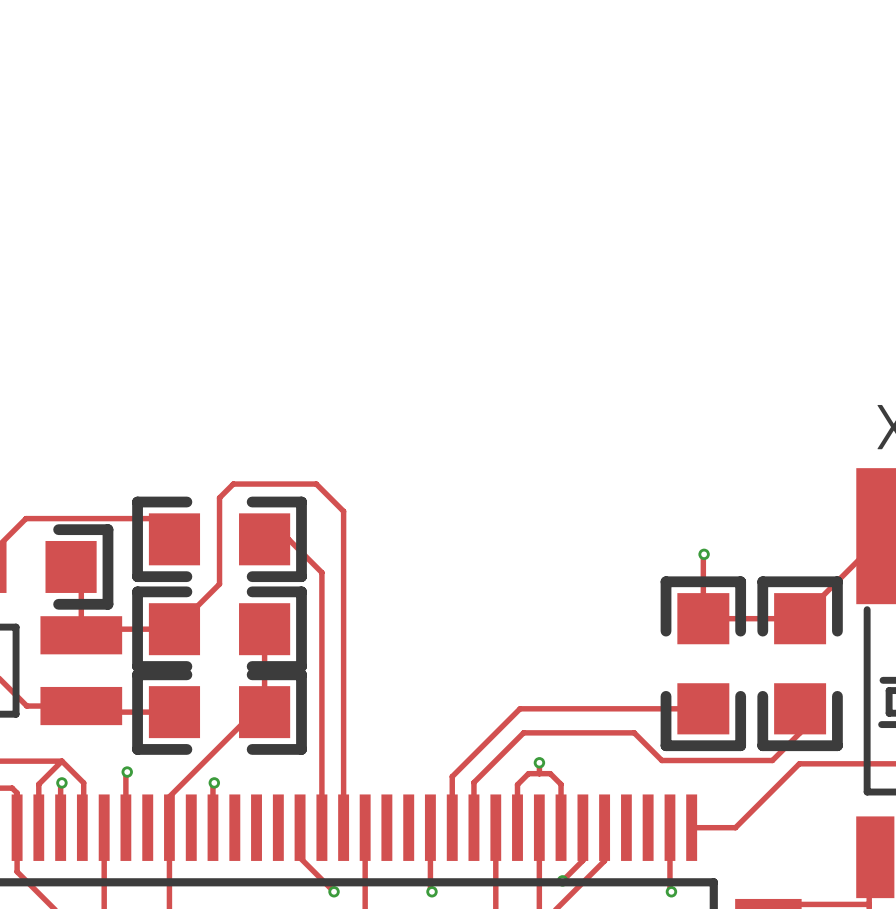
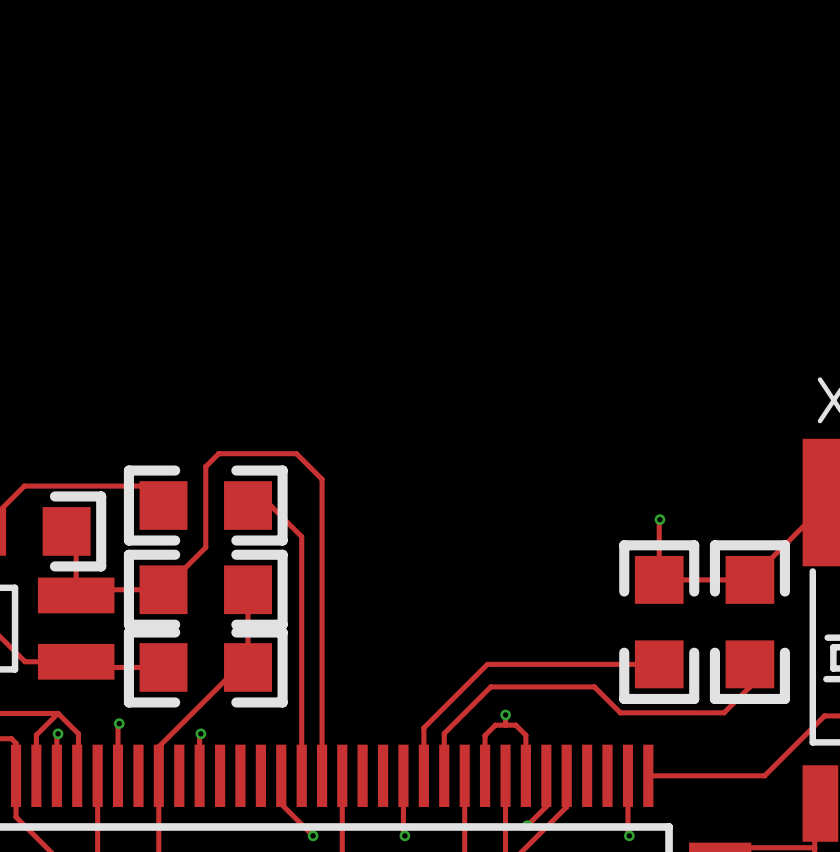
track: (879, 763) (799, 763) (735, 827) -> (824, 715) (764, 775) (689, 775)

